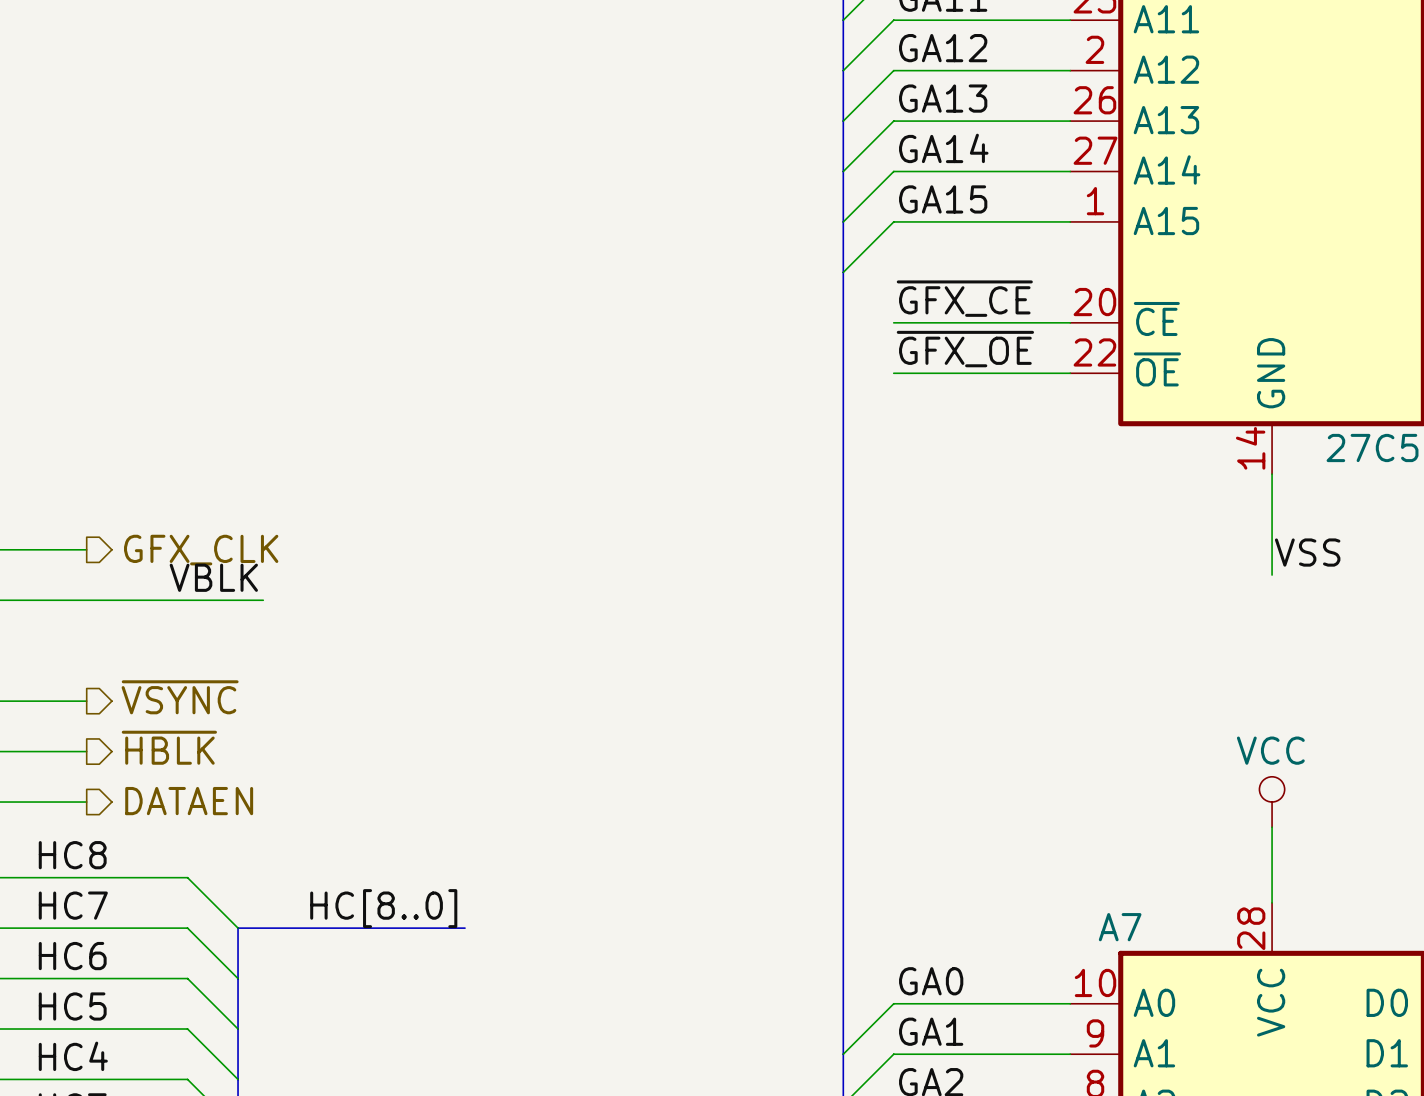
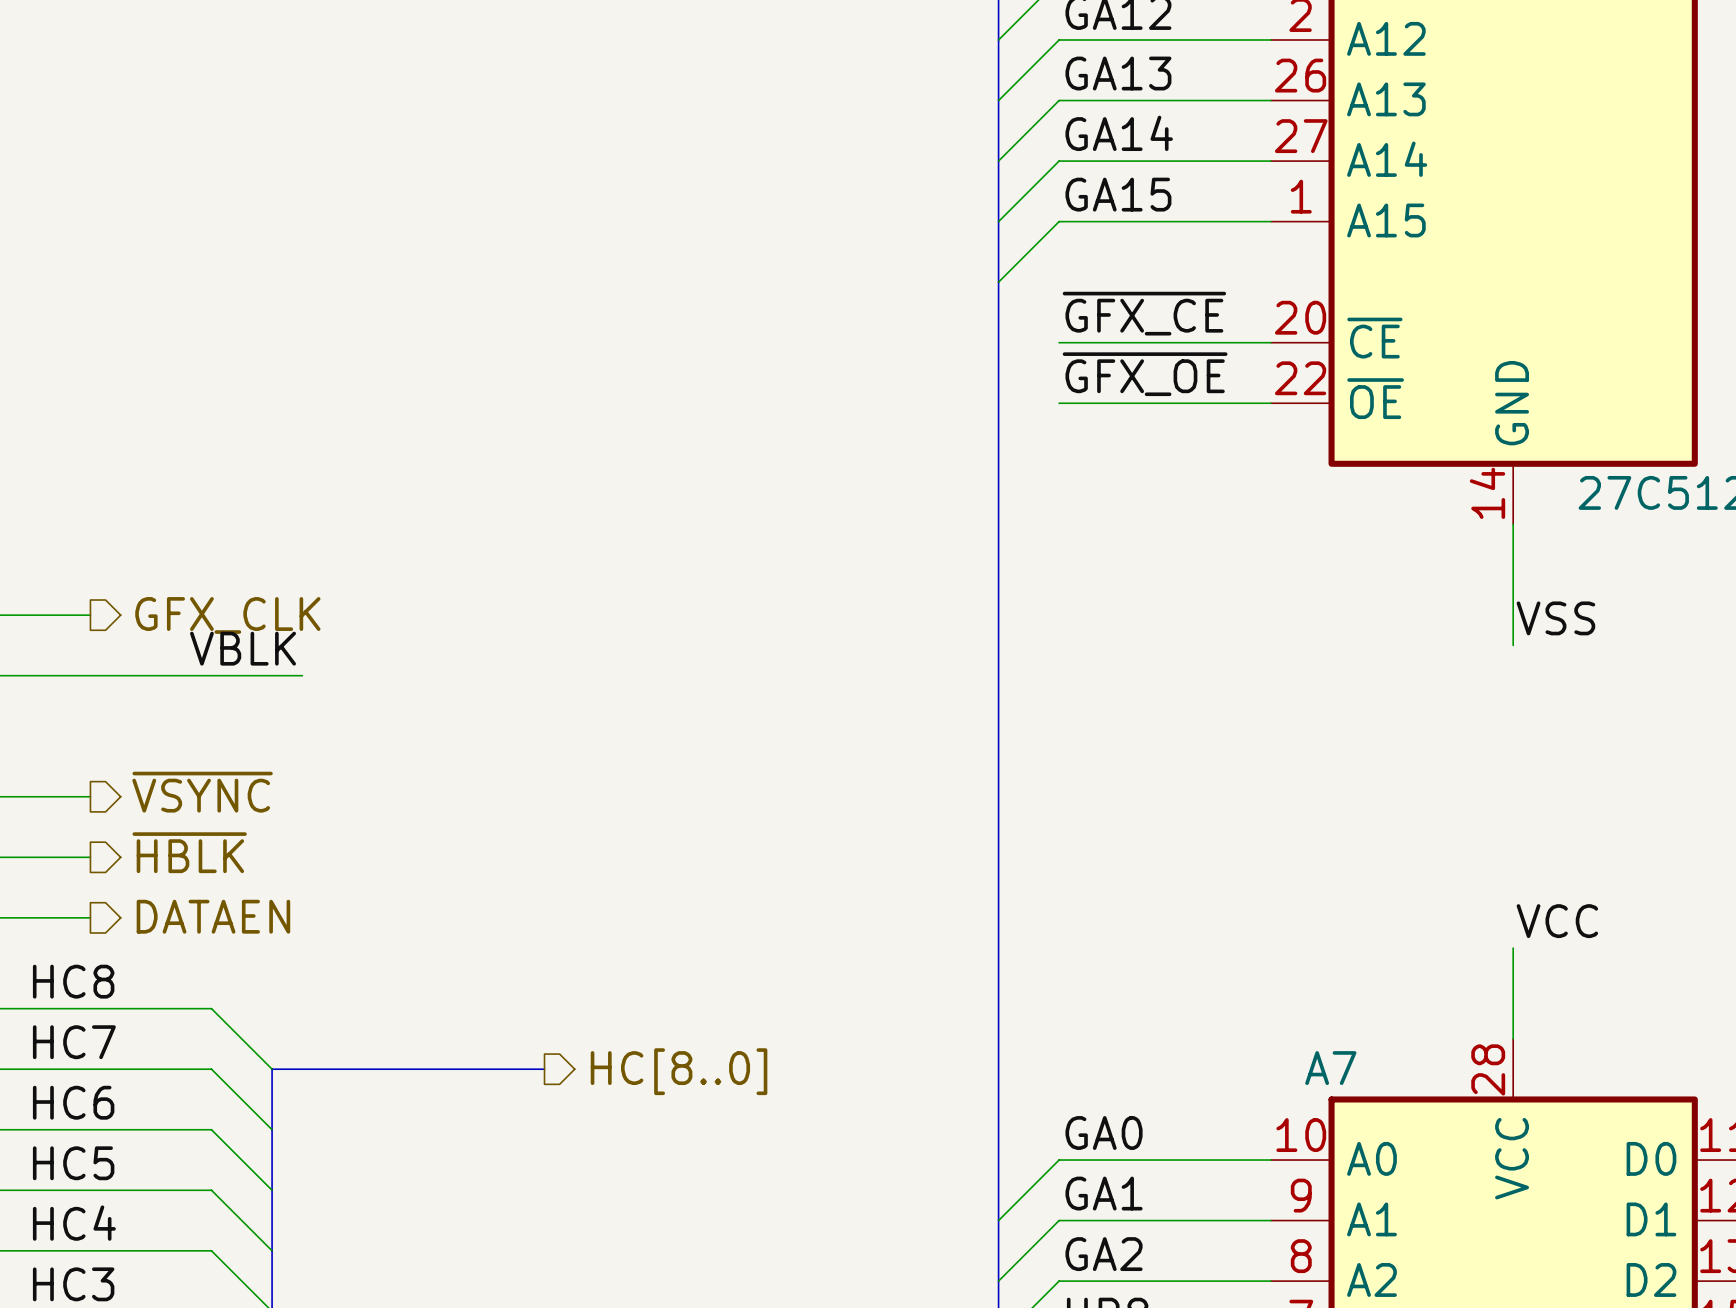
power symbol: VCC (1272, 802) -> none
label: none -> VCC (1557, 921)
label: HC[8..0] (383, 908) -> none
hierarchical label: none -> HC[8..0] (679, 1071)

